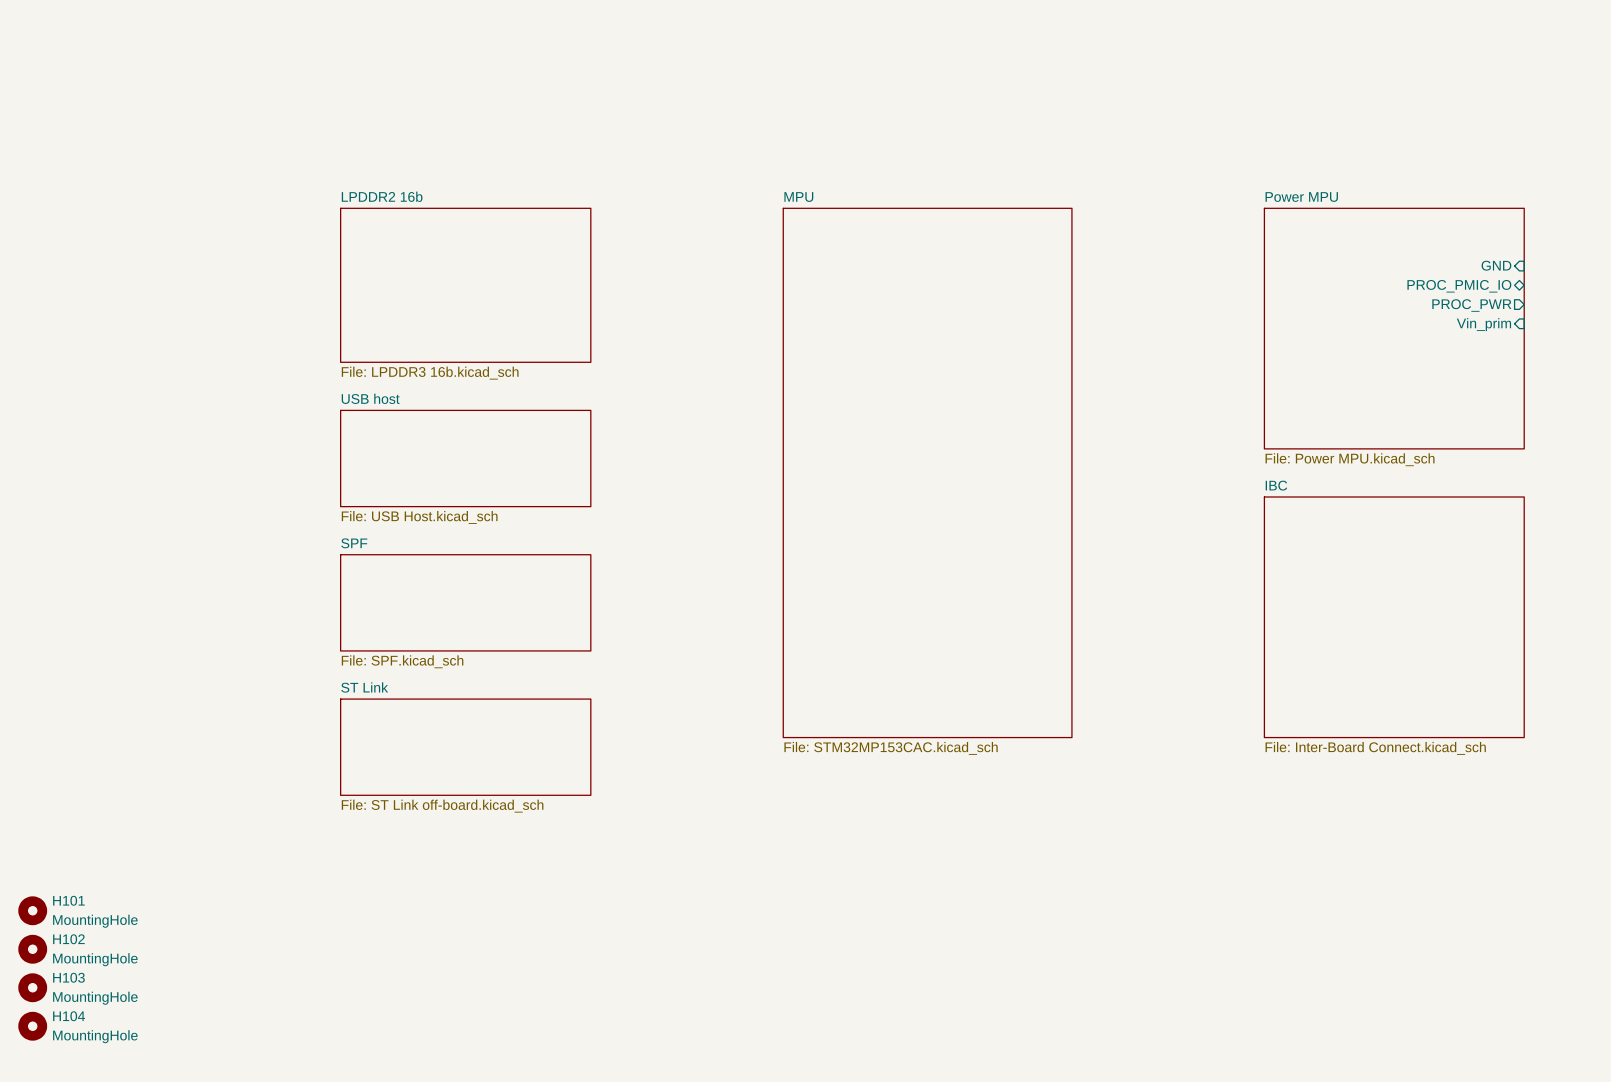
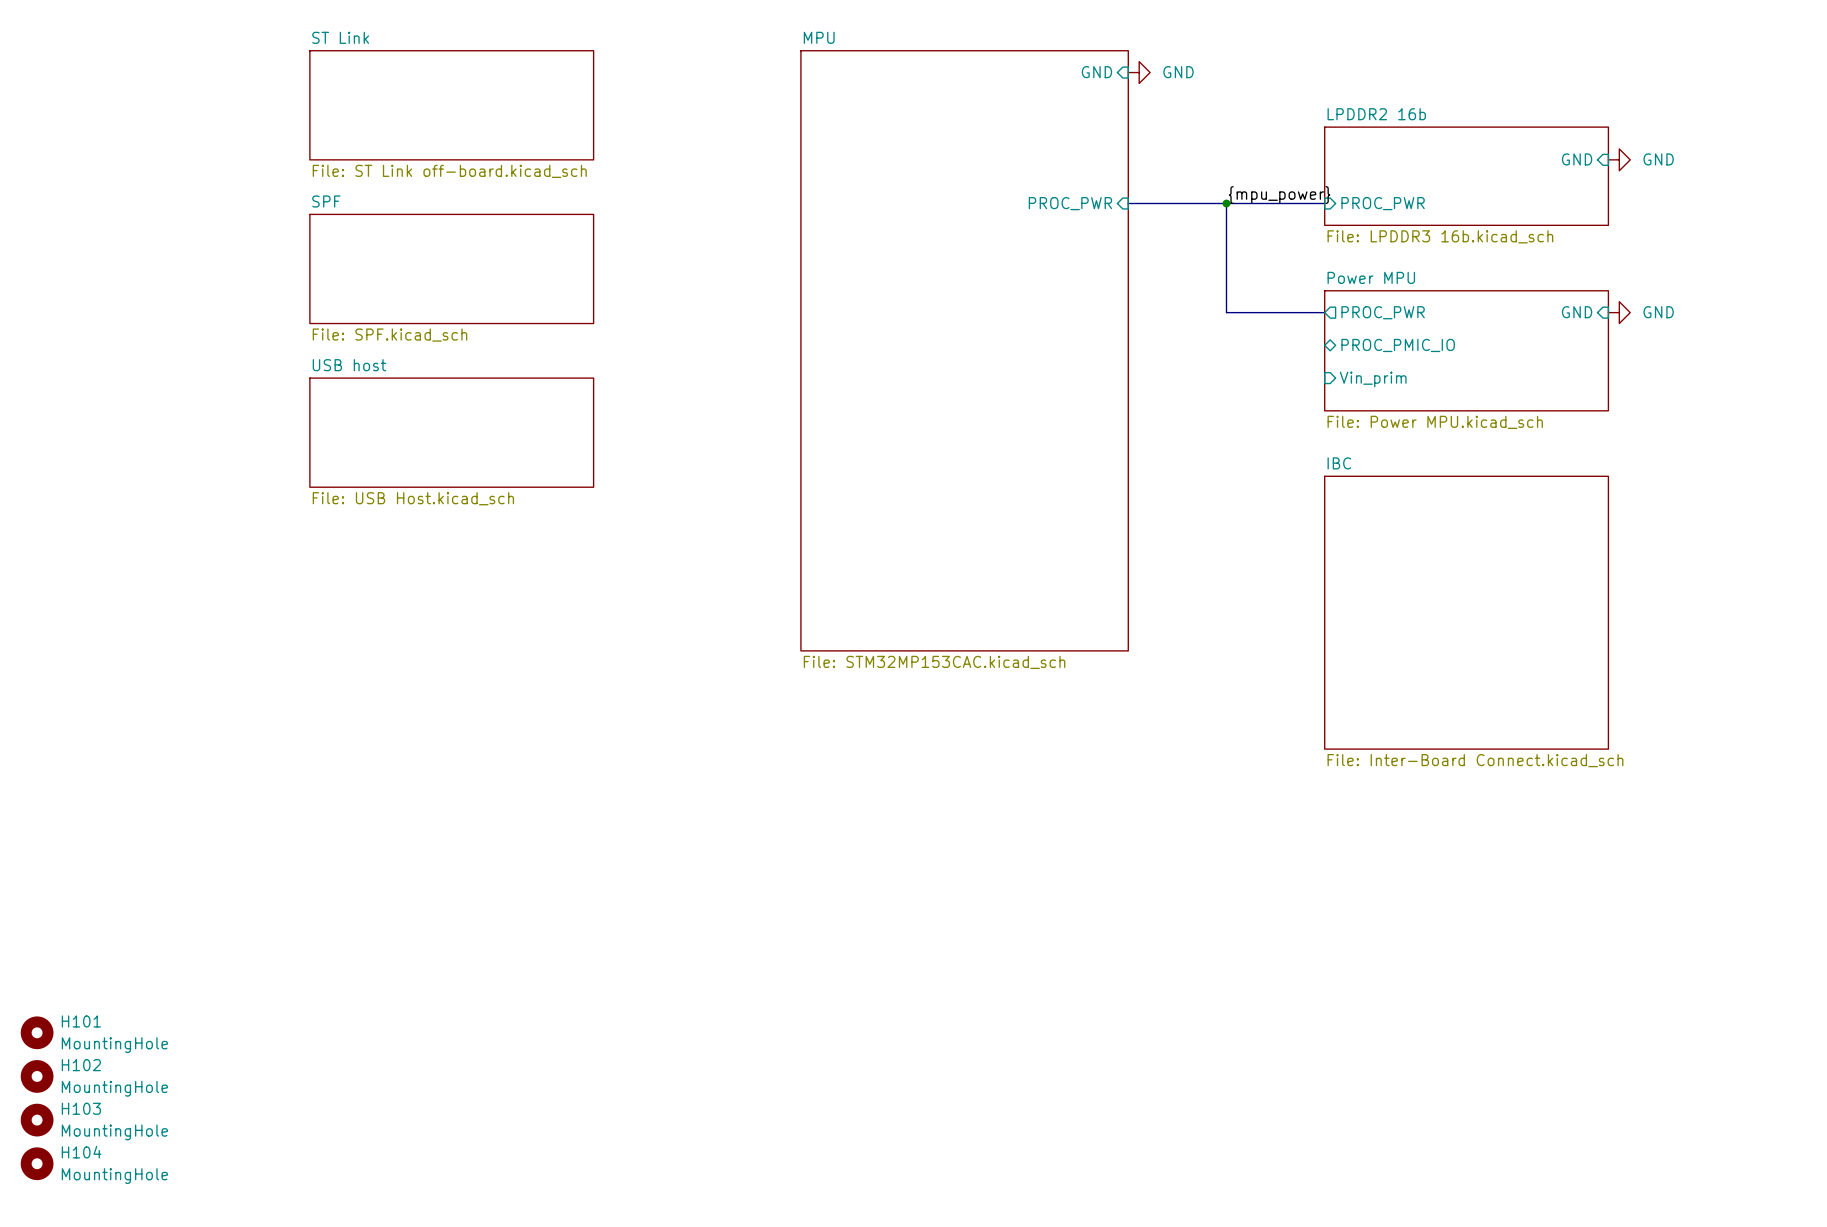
sheet pin: none -> GND (1096, 72)
power symbol: none -> GND (1139, 72)
sheet ST Link: none -> File: ST Link off-board.kicad_sch (451, 105)
sheet pin: none -> GND (1577, 159)
power symbol: none -> GND (1619, 159)
label: none -> {mpu_power} (1279, 195)
bus: none -> (1128, 203) (1324, 203)
bus: none -> (1226, 203) (1226, 312) (1324, 312)
junction: none -> (1226, 203)
sheet pin: none -> PROC_PWR (1070, 203)
sheet pin: none -> PROC_PWR (1383, 203)
sheet LPDDR2 16b name position: LPDDR2 16b (382, 196) -> LPDDR2 16b (1376, 114)
sheet LPDDR2 16b shape: [340, 207, 592, 363] -> [1324, 126, 1610, 226]
sheet SPF: none -> File: SPF.kicad_sch (451, 268)
sheet pin: GND (1496, 265) -> none
sheet pin: none -> GND (1577, 312)
power symbol: none -> GND (1619, 312)
sheet pin: none -> PROC_PWR (1383, 312)
sheet pin: PROC_PMIC_IO (1459, 286) -> none
sheet pin: none -> PROC_PMIC_IO (1398, 345)
sheet pin: PROC_PWR (1471, 305) -> none
sheet Power MPU: none -> File: Power MPU.kicad_sch (1466, 350)
sheet pin: Vin_prim (1483, 324) -> none
sheet Power MPU: File: Power MPU.kicad_sch (1394, 328) -> none
sheet pin: none -> Vin_prim (1373, 379)
sheet LPDDR2 16b value position: File: LPDDR3 16b.kicad_sch (430, 373) -> File: LPDDR3 16b.kicad_sch (1440, 236)
sheet USB host position: (465, 458) -> (451, 432)
sheet MPU position: (927, 472) -> (964, 350)
sheet IBC: none -> File: Inter-Board Connect.kicad_sch (1466, 612)
sheet SPF: File: SPF.kicad_sch (465, 602) -> none
sheet IBC: File: Inter-Board Connect.kicad_sch (1394, 617) -> none
sheet ST Link: File: ST Link off-board.kicad_sch (465, 747) -> none

